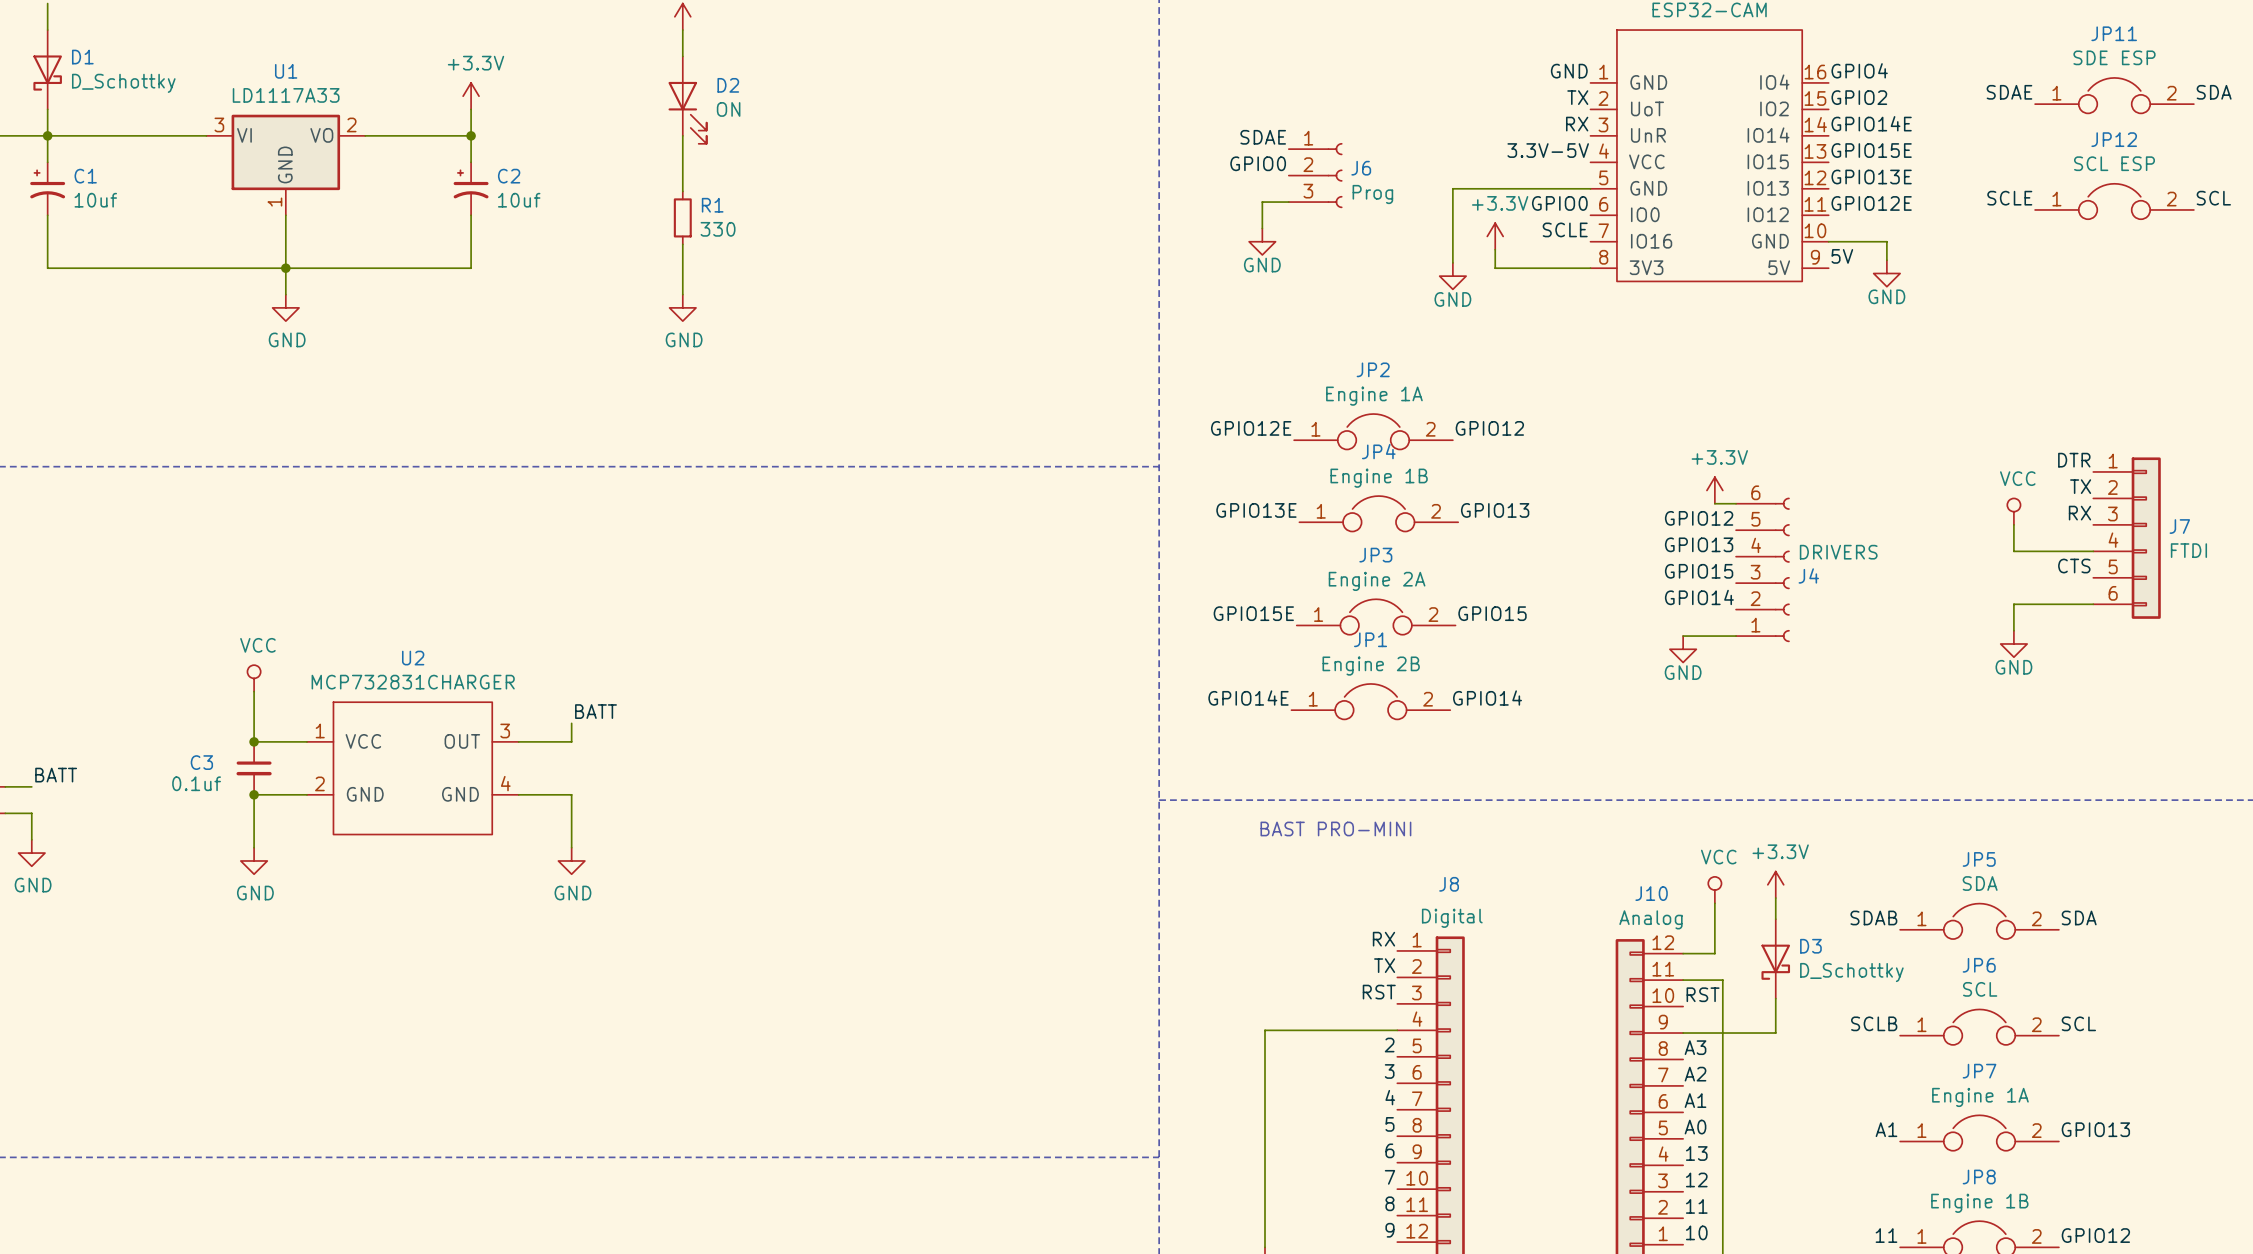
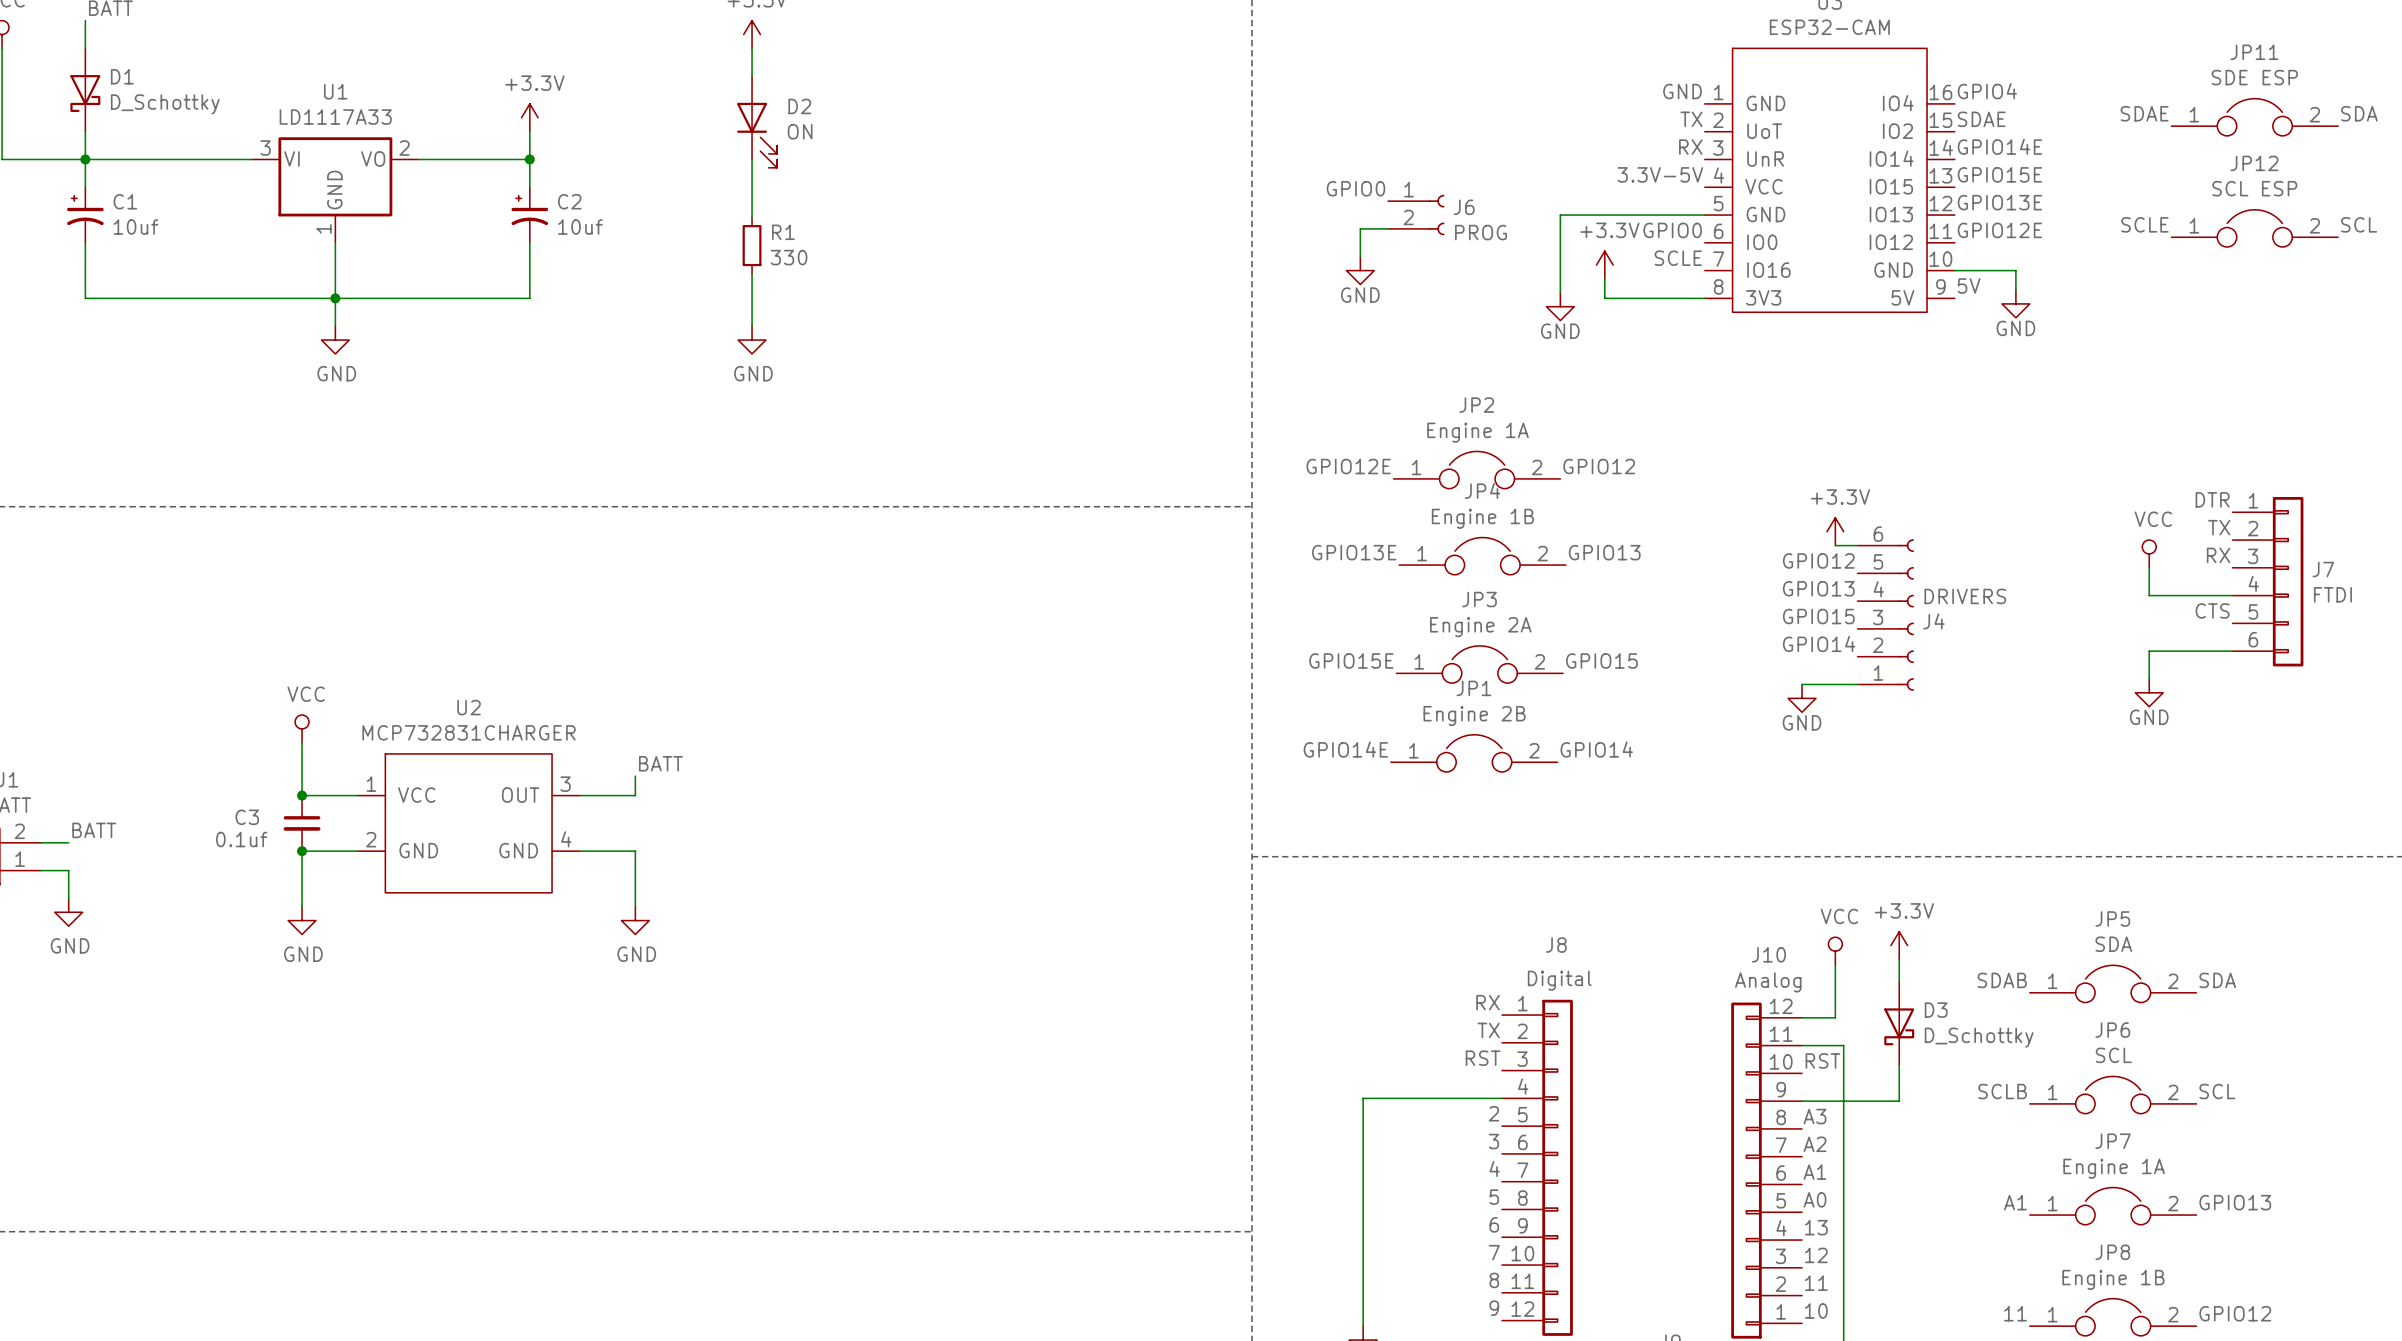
label: GPIO2 (1859, 97) -> SDAE (1981, 119)
label: SDAE (1263, 137) -> none
J6 symbol: [1288, 143, 1343, 209] -> [1388, 194, 1445, 236]
J6 value: Prog (1372, 194) -> PROG (1481, 232)
text: BAST PRO-MINI (1335, 828) -> none

